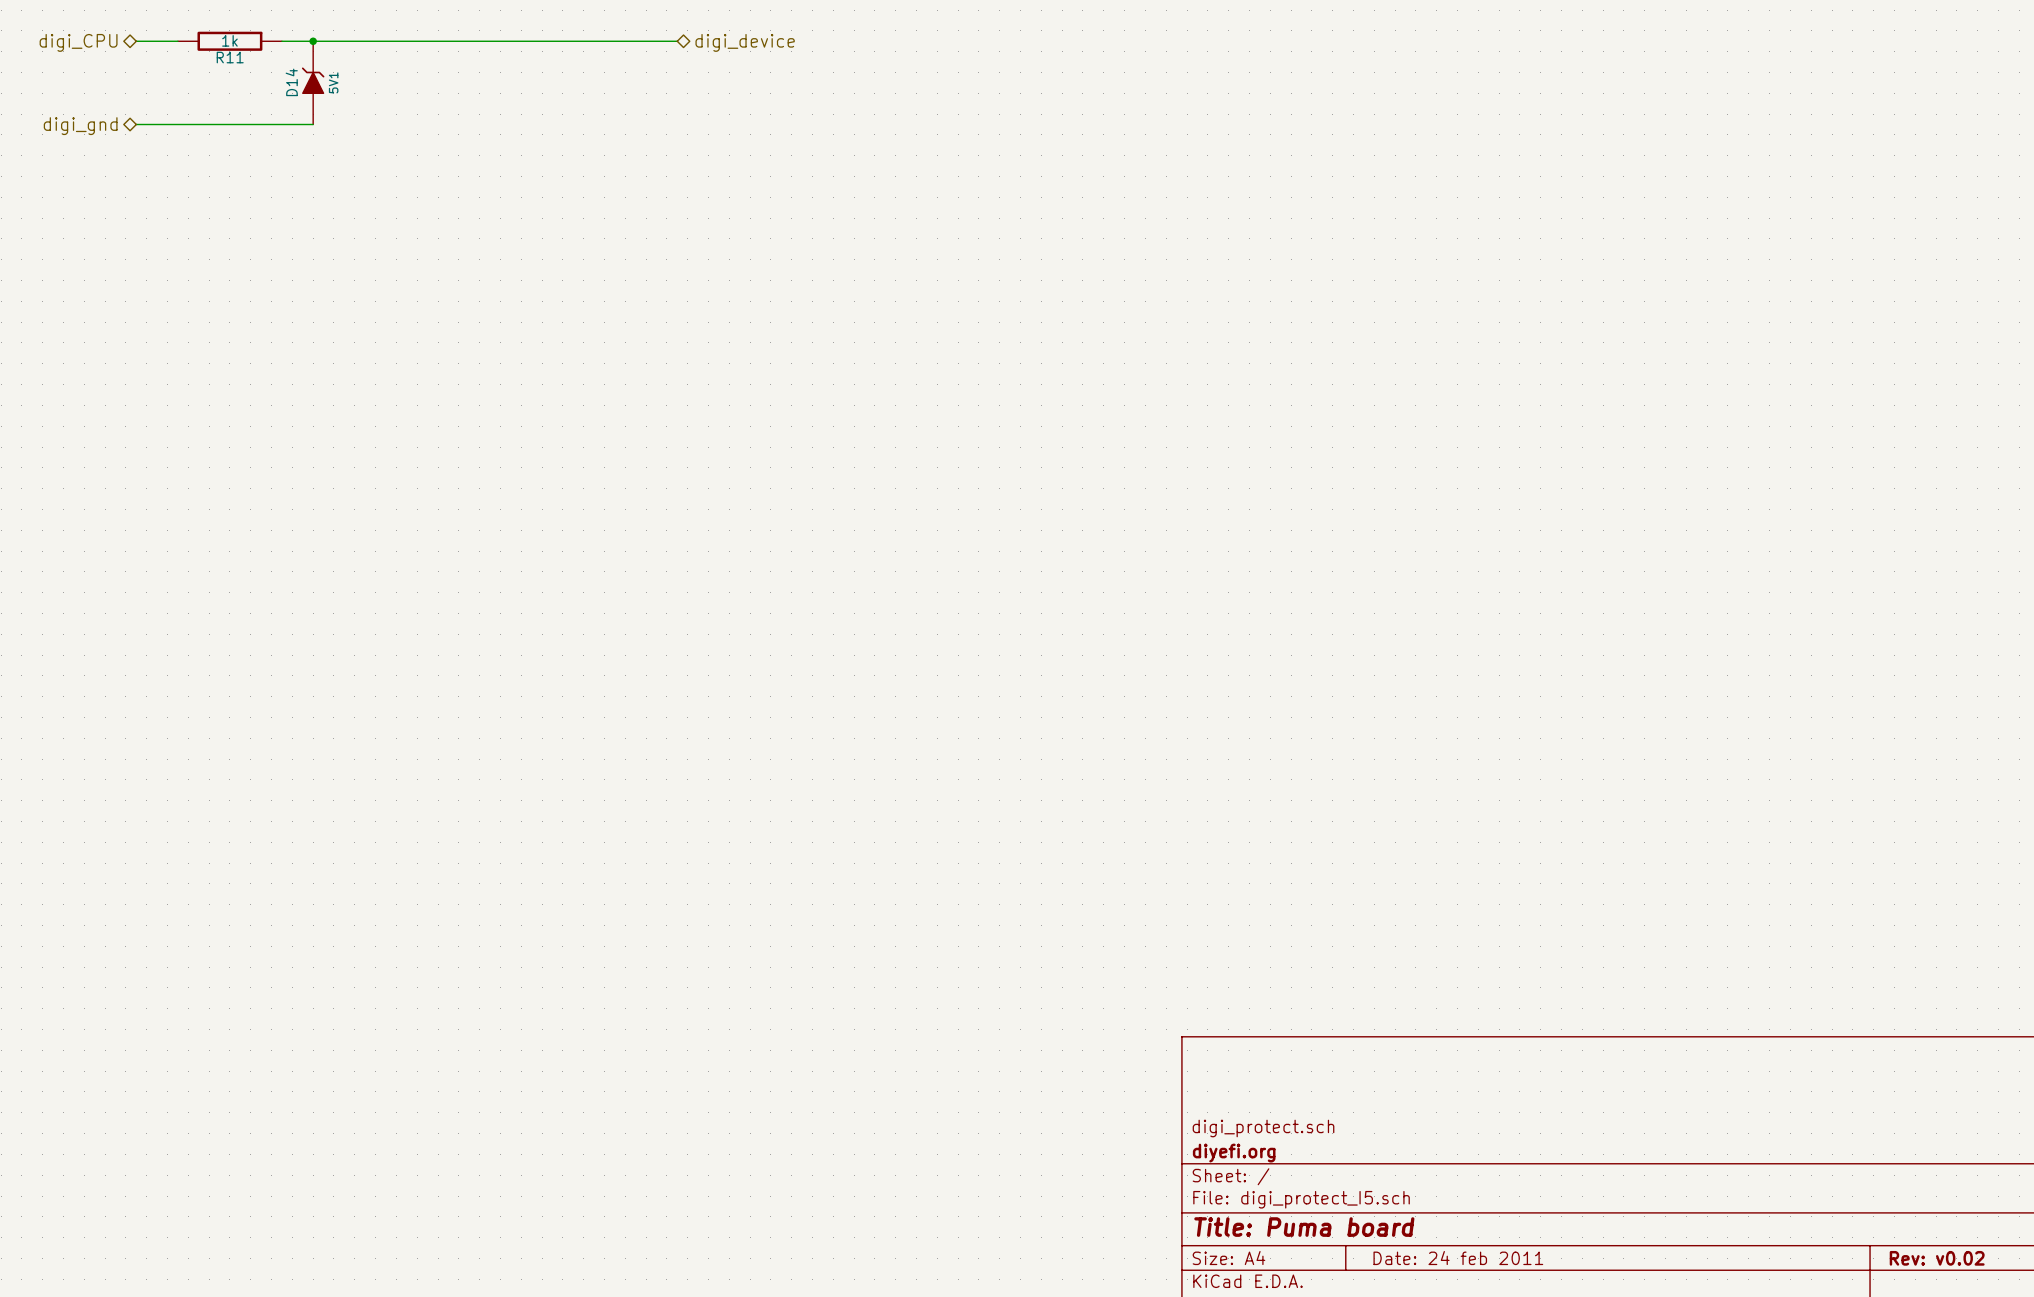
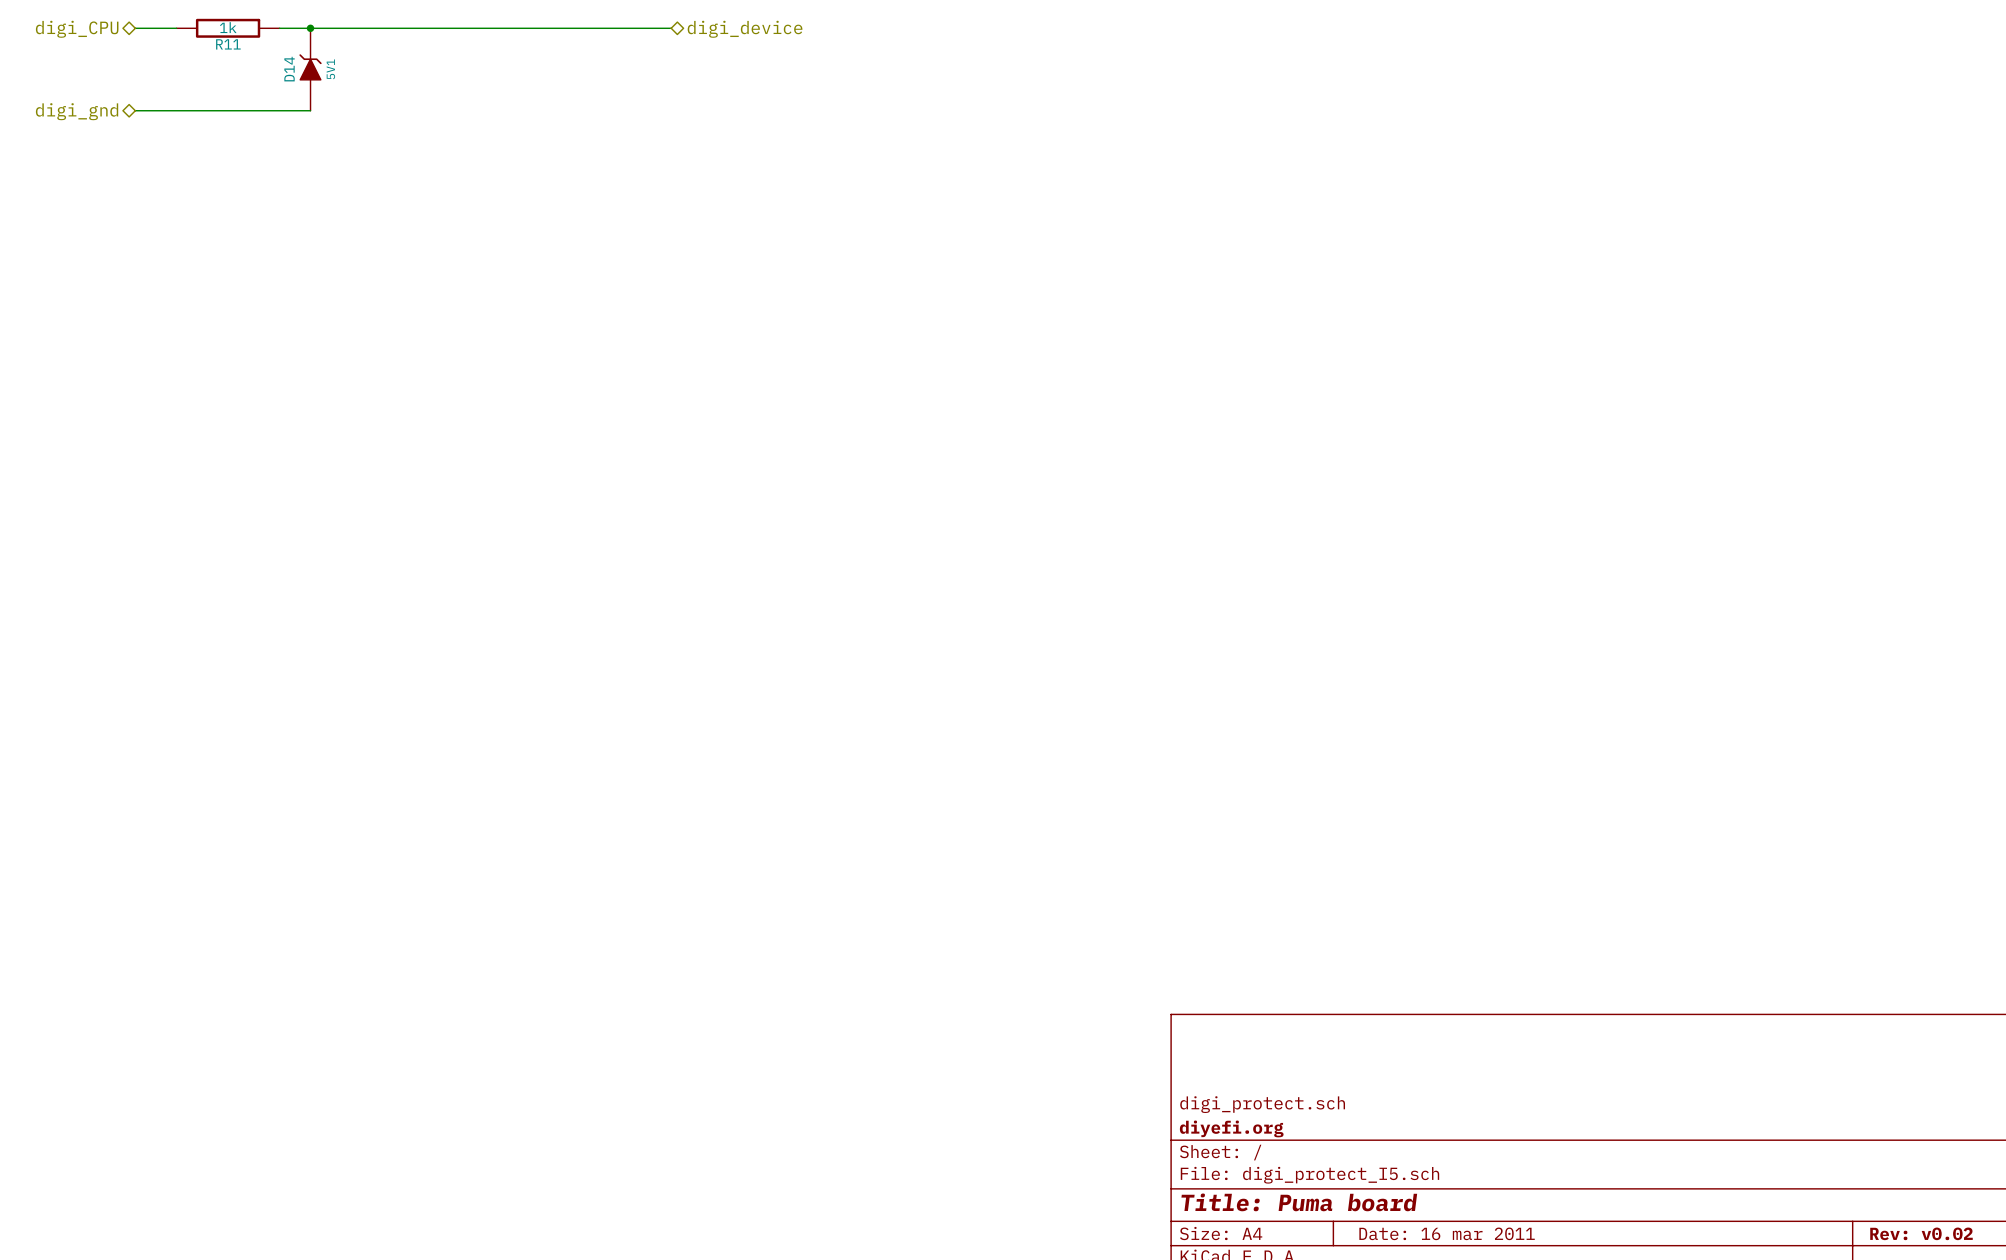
title block: Date: 24 feb 2011 (1458, 1258) -> Date: 16 mar 2011 (1447, 1233)

